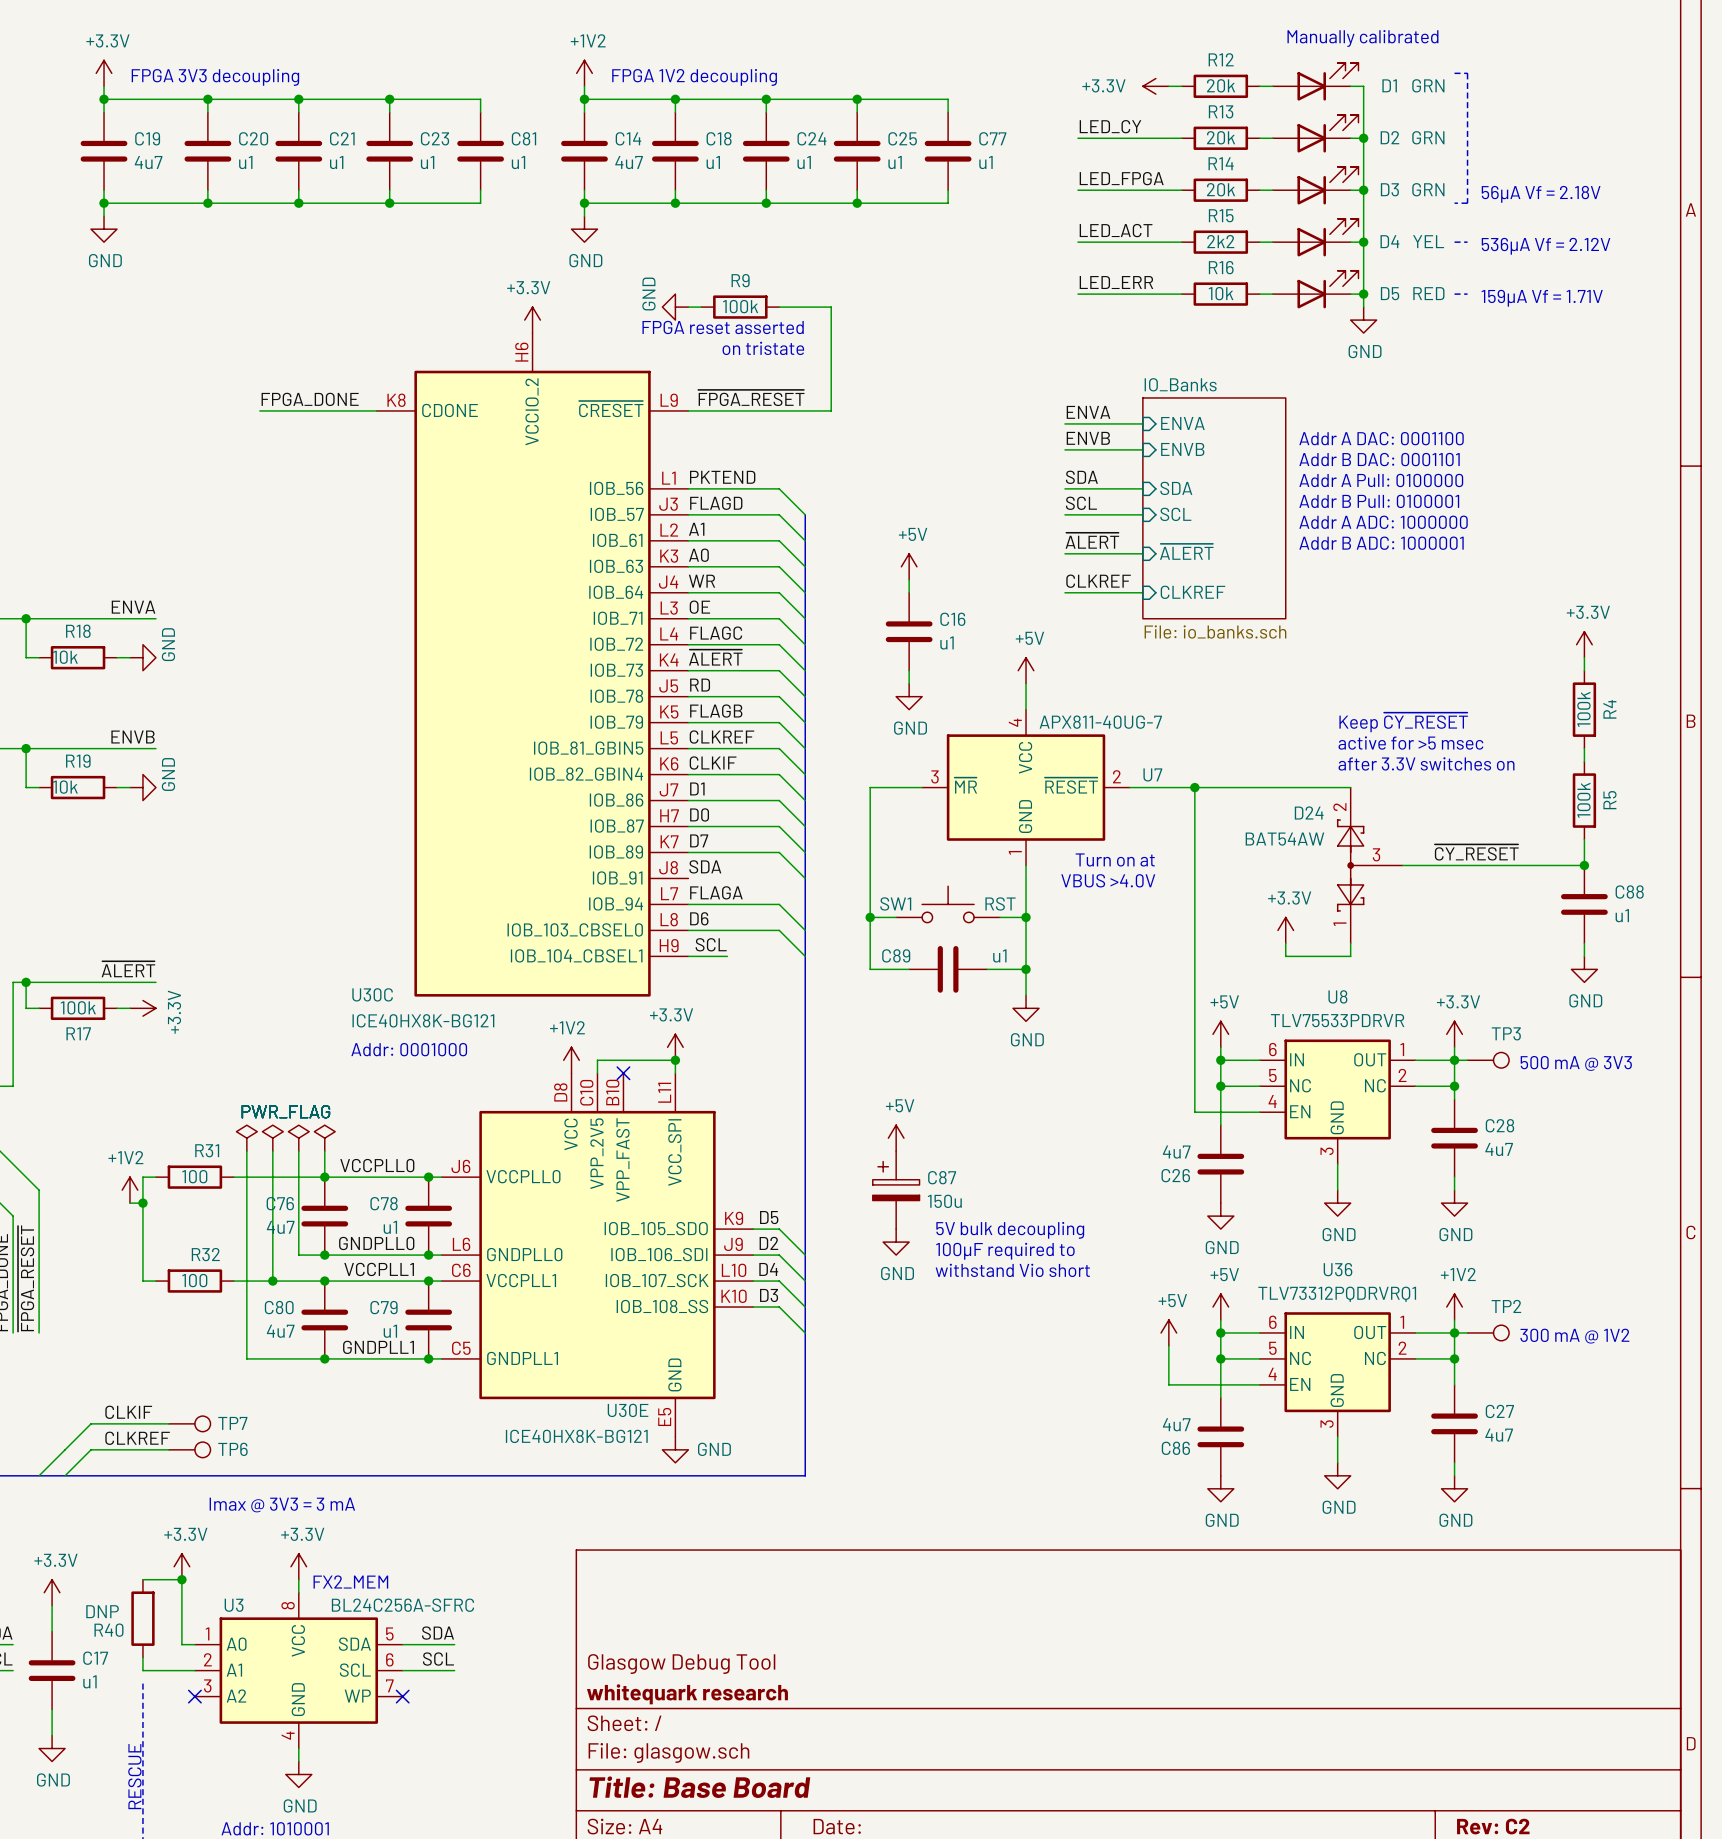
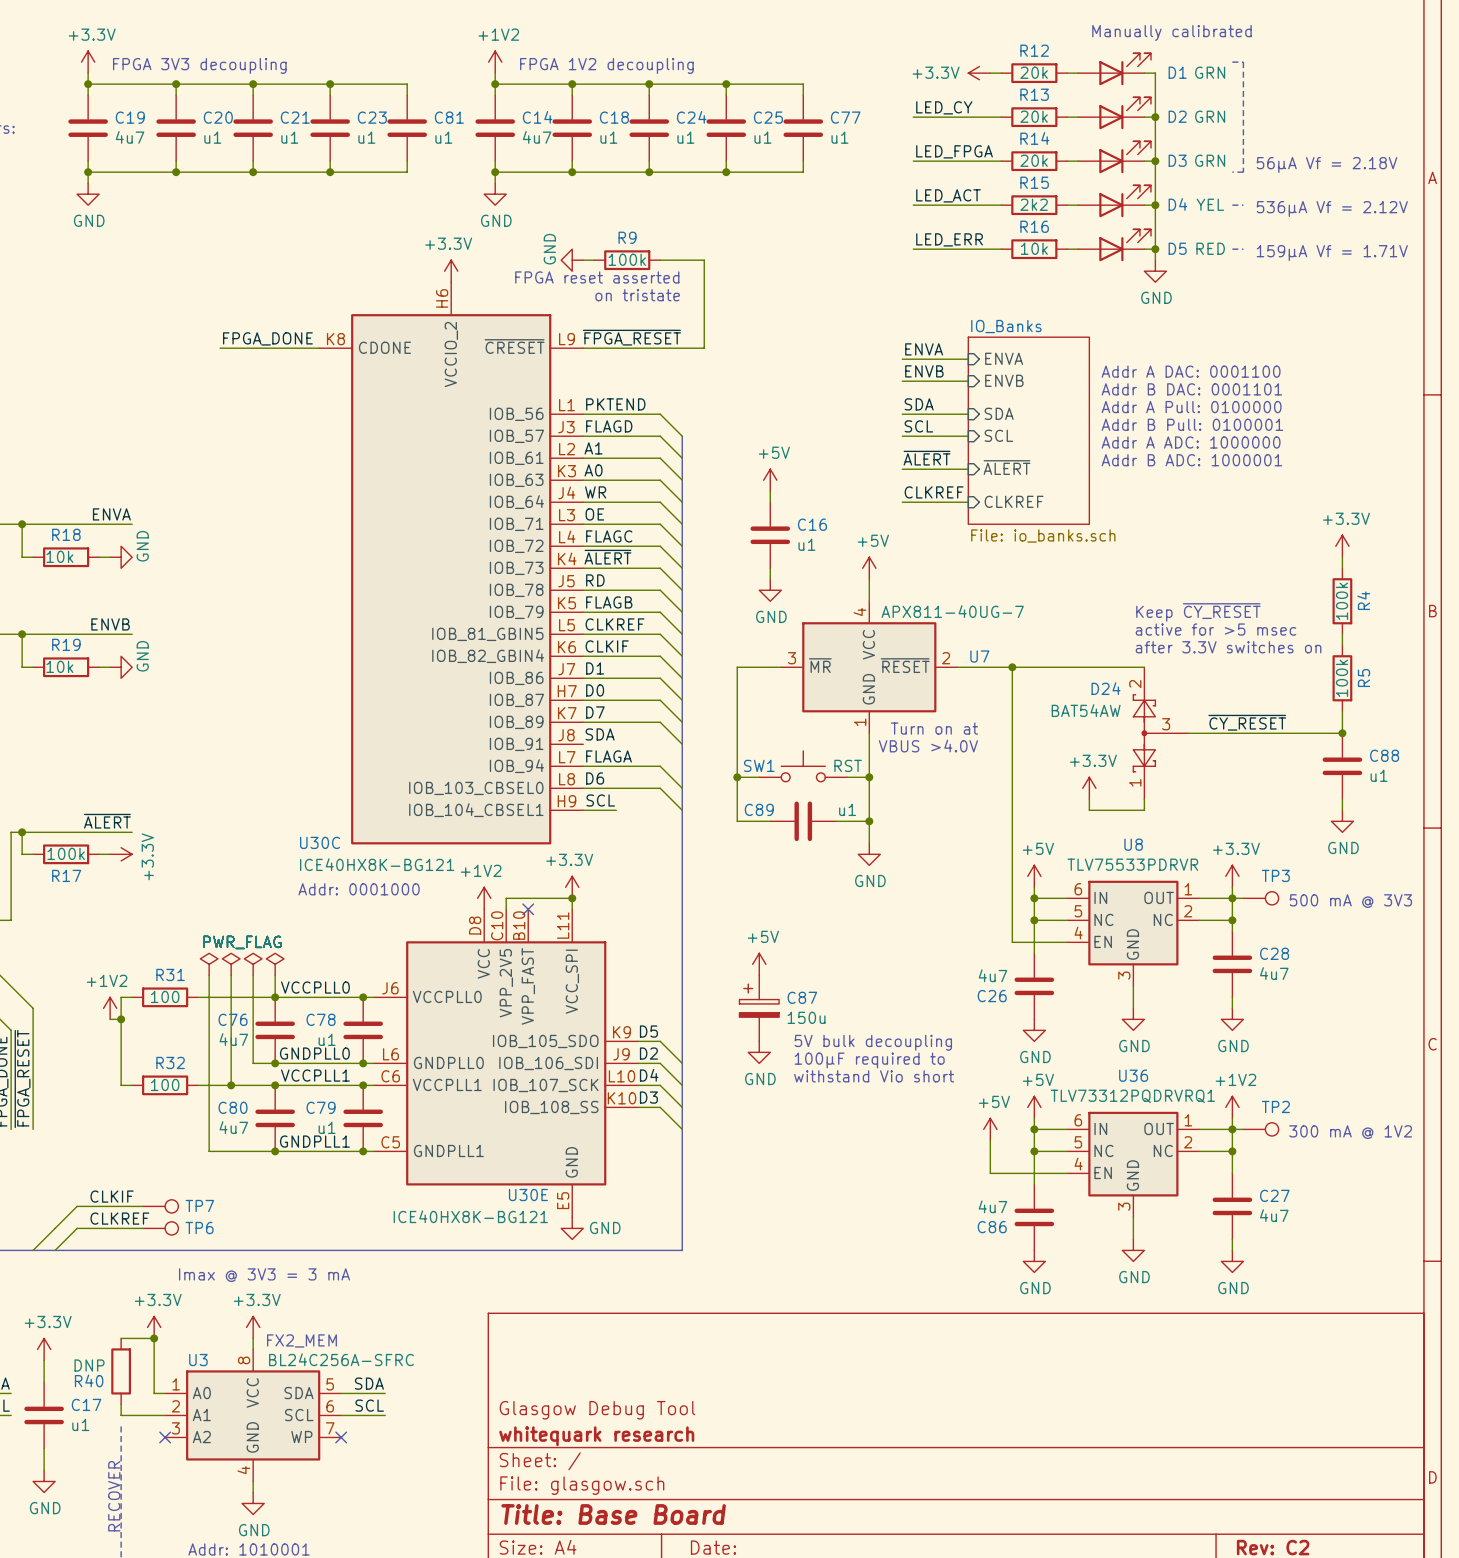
text: RESCUE (134, 1776) -> RECOVER (114, 1496)

